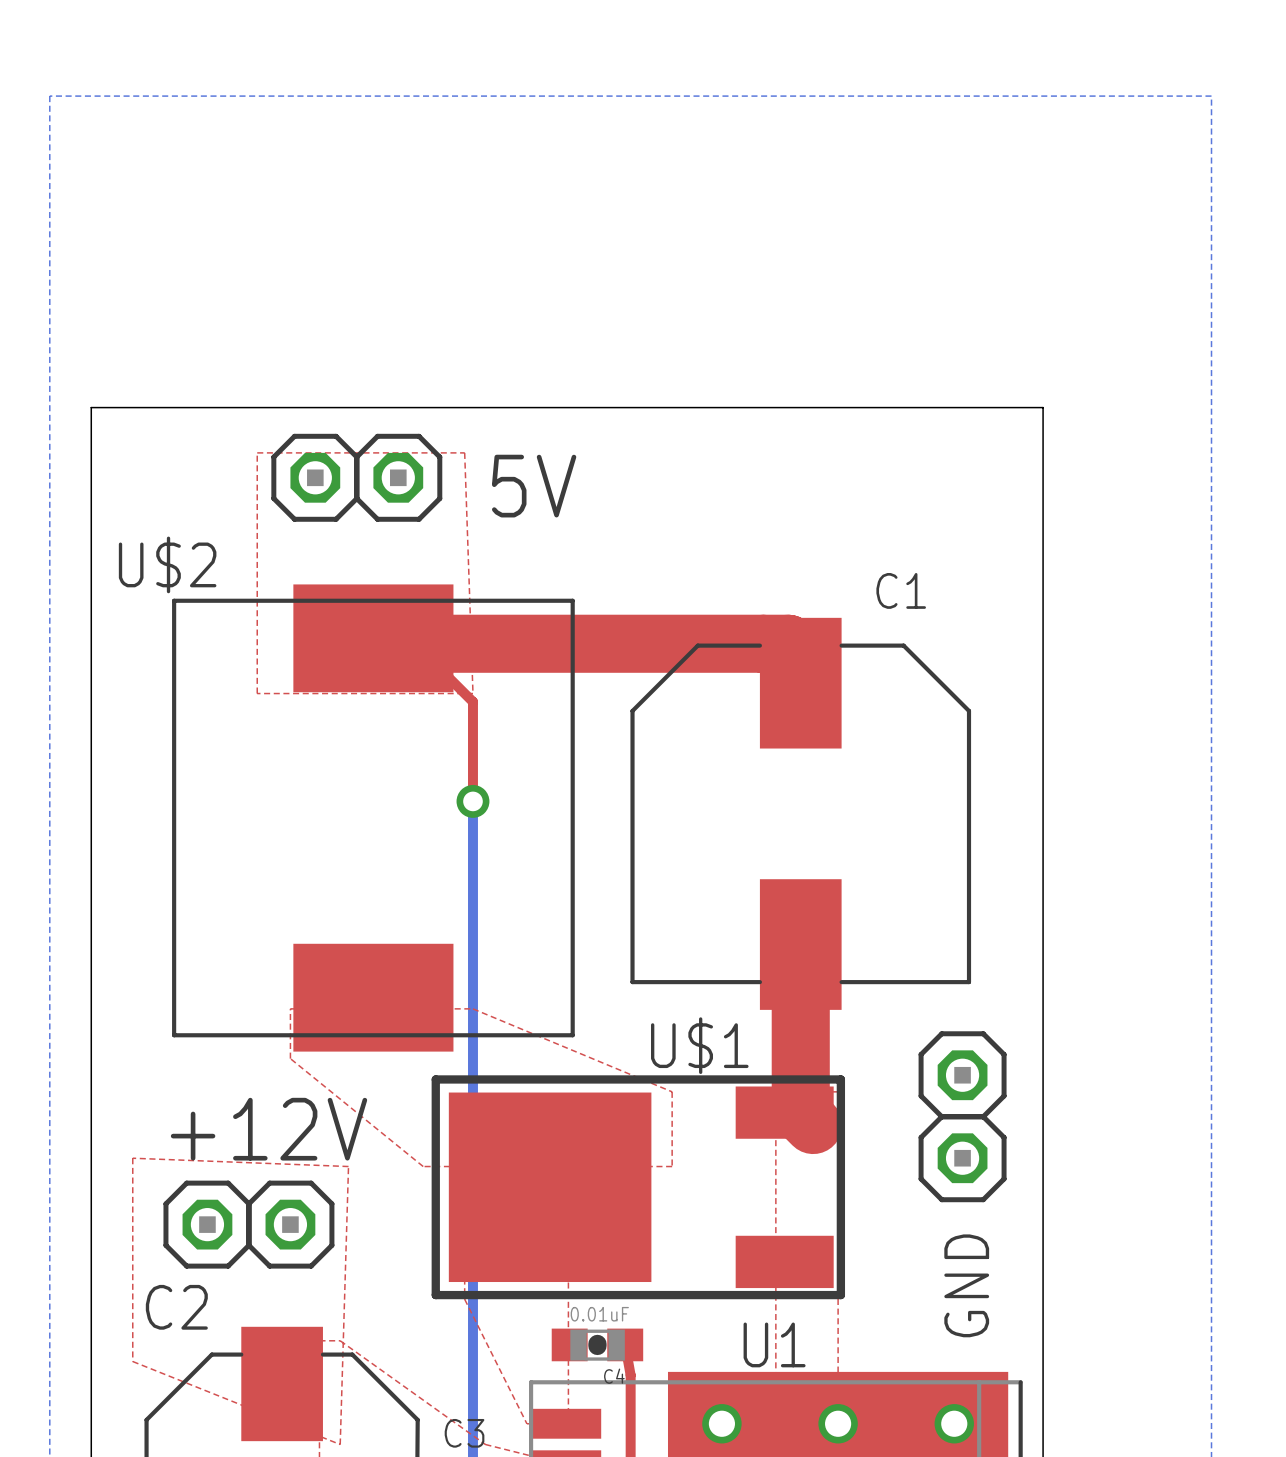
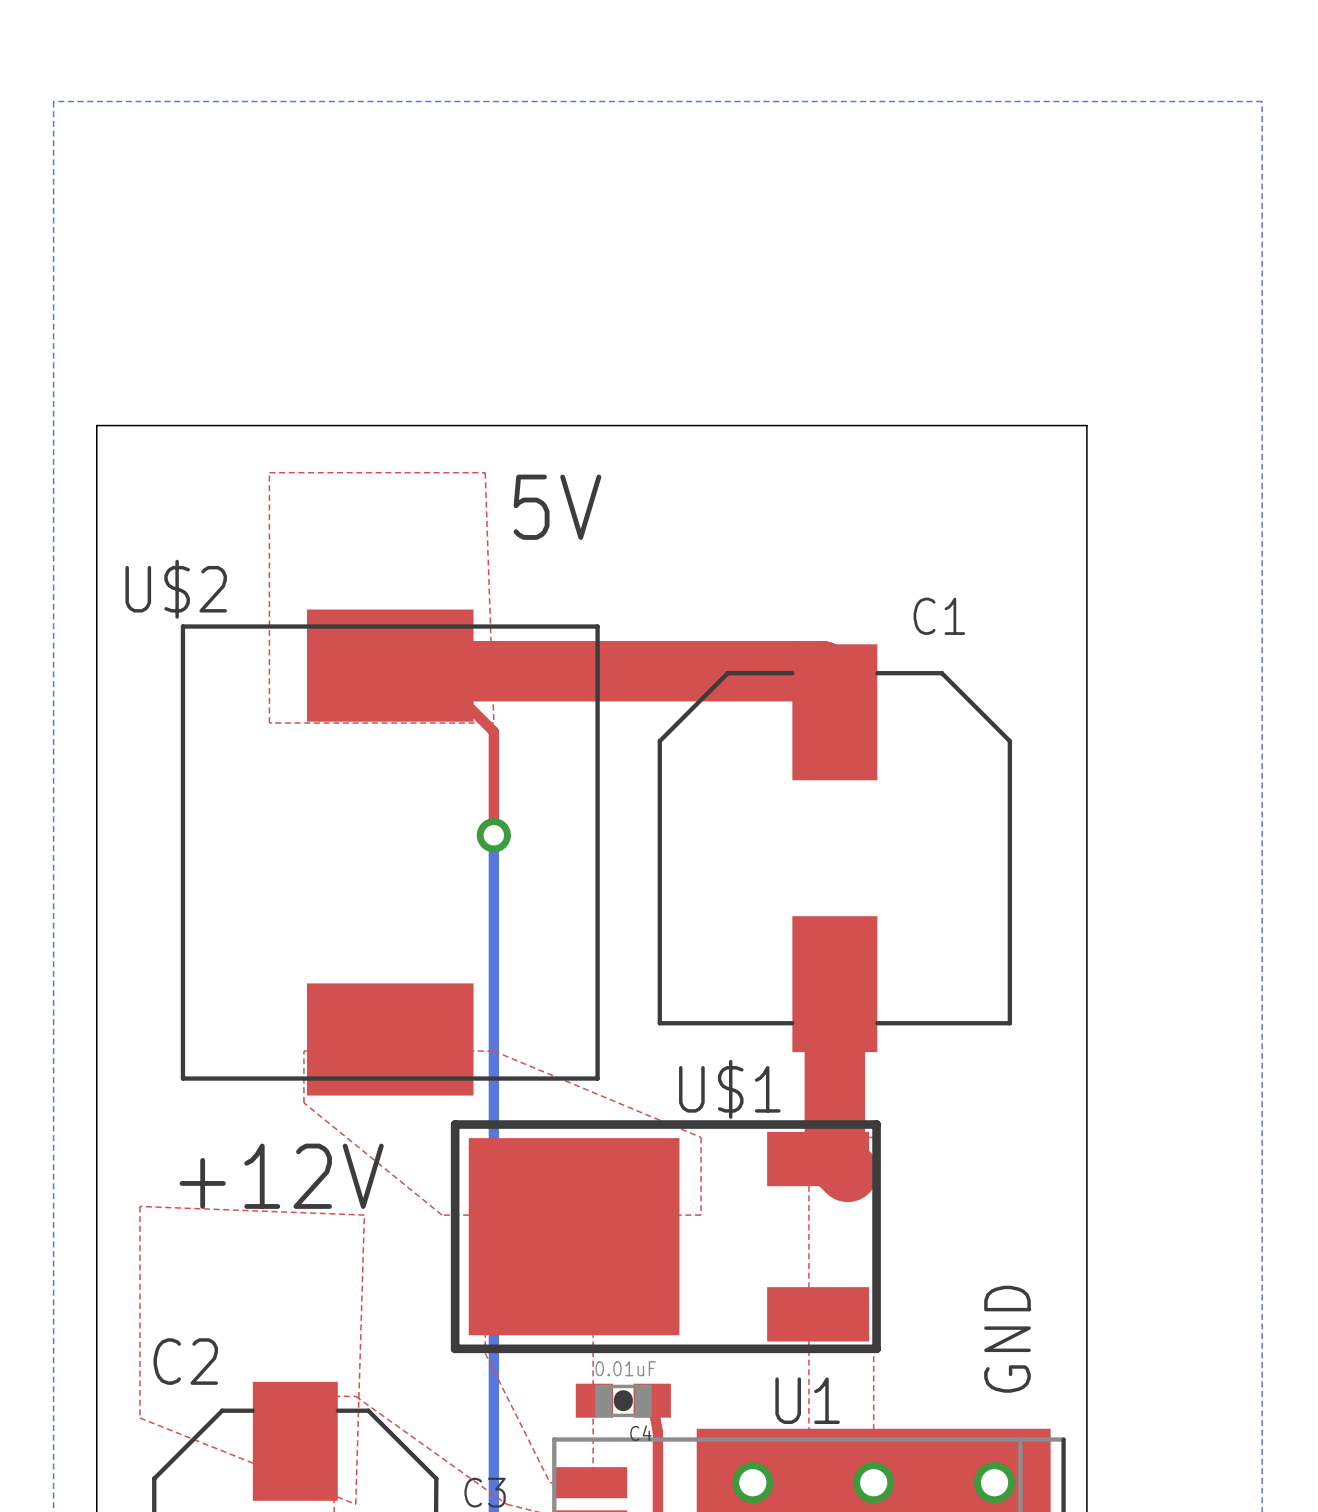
part: (315, 477) -> none
part: (398, 477) -> none
part: (962, 1075) -> none
part: (962, 1158) -> none
part: (207, 1224) -> none
part: (290, 1224) -> none

